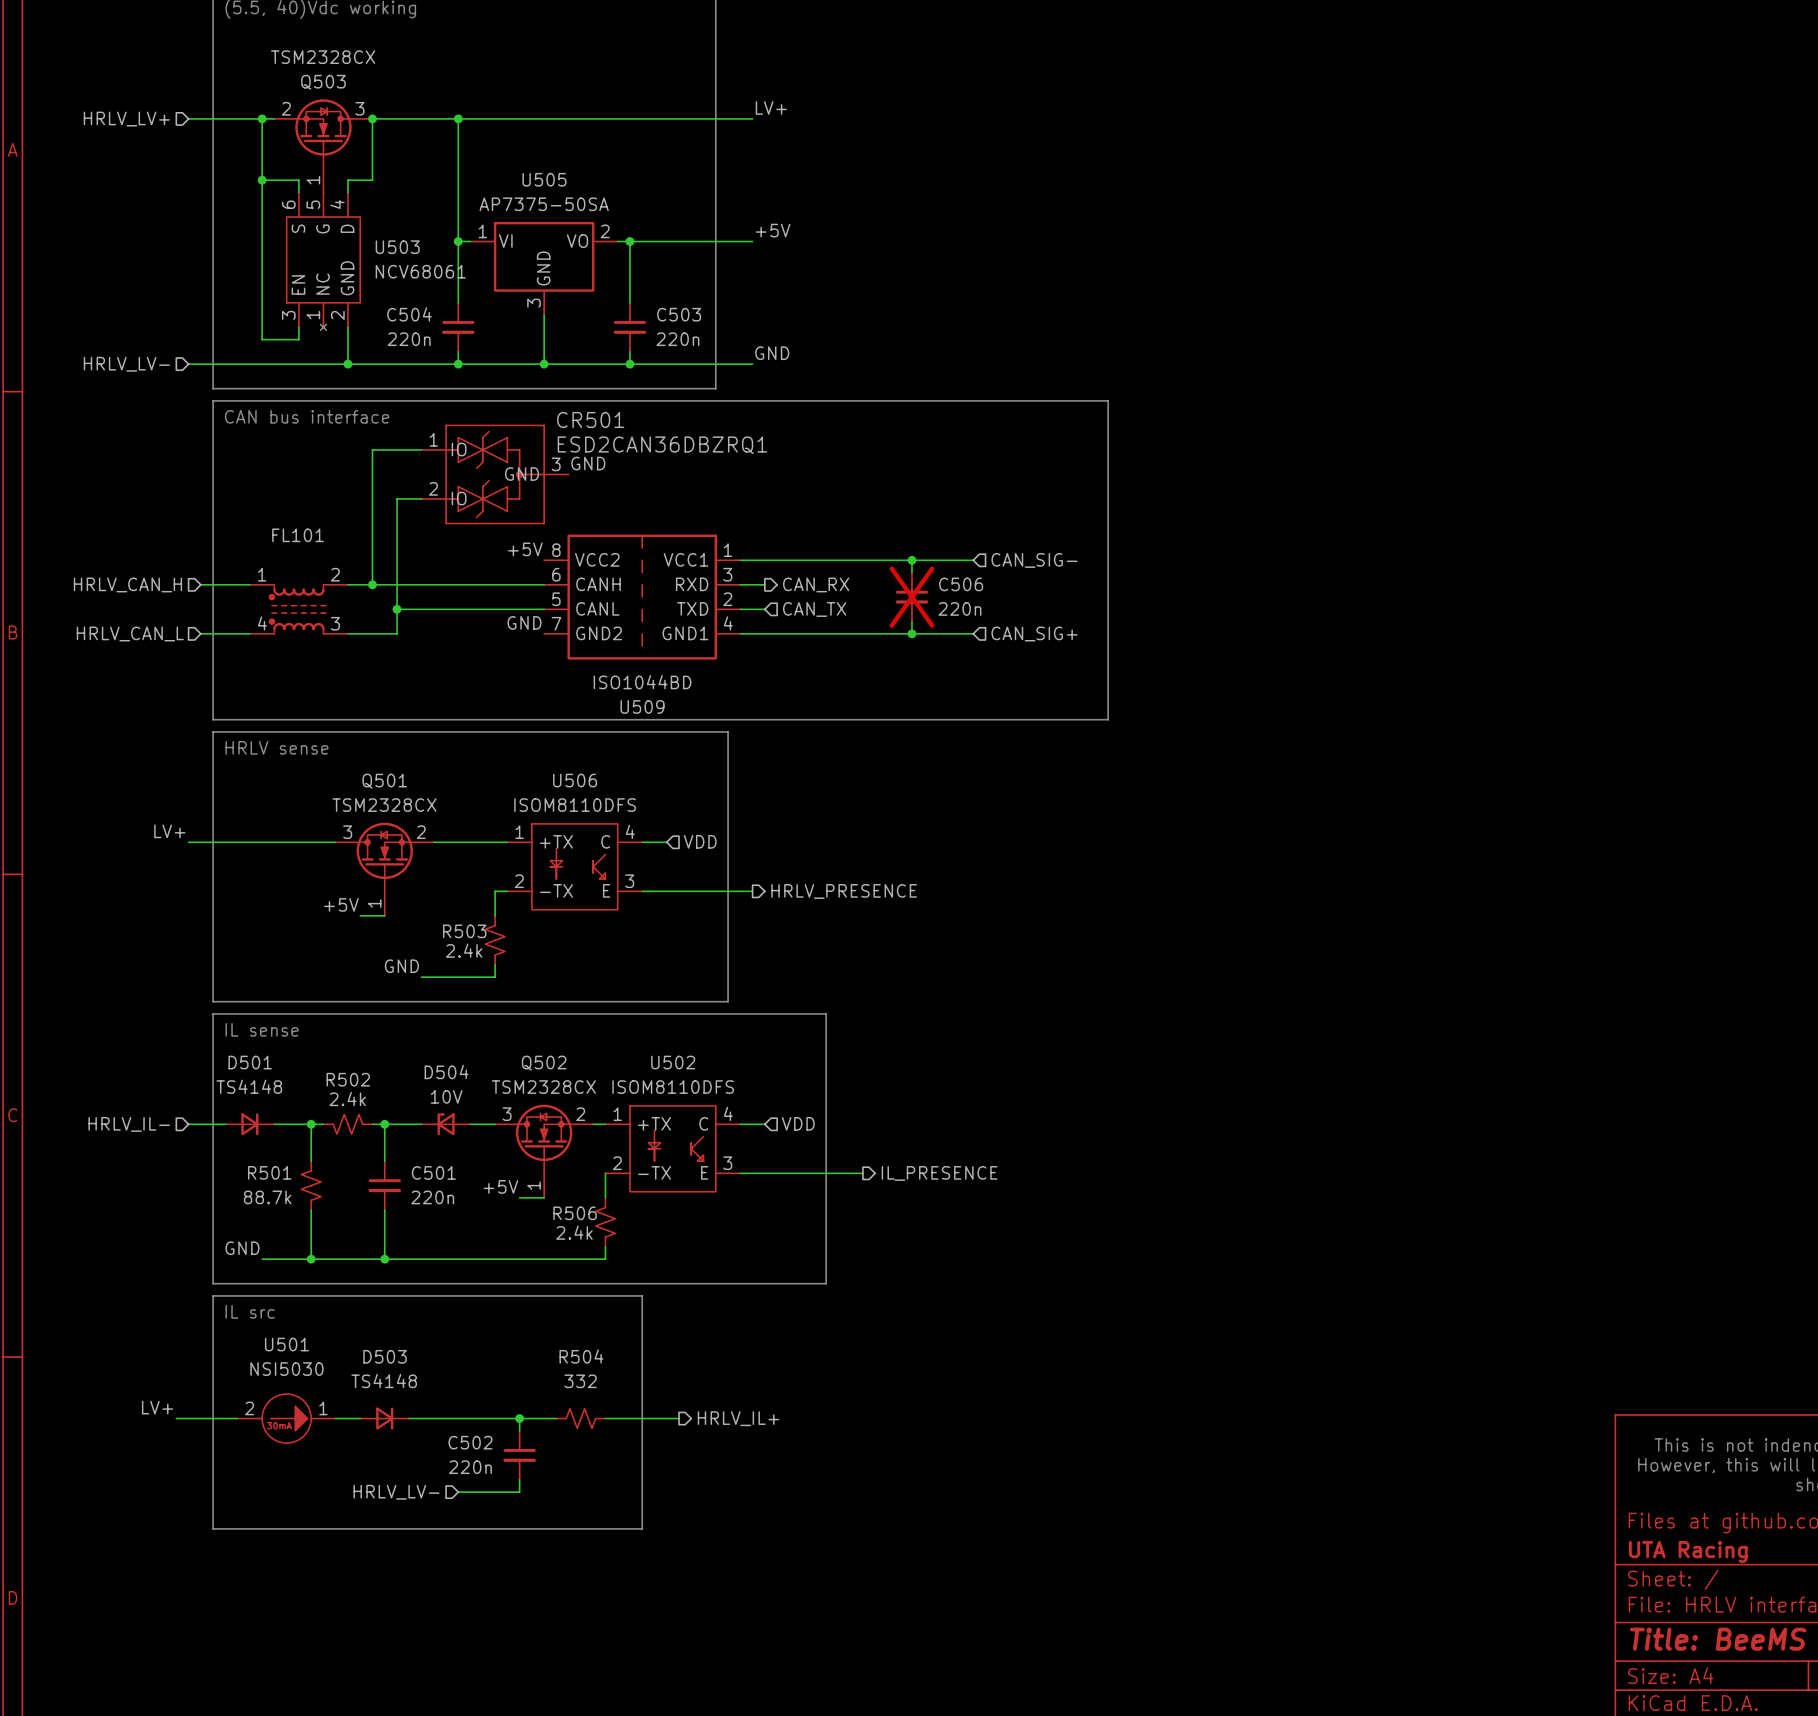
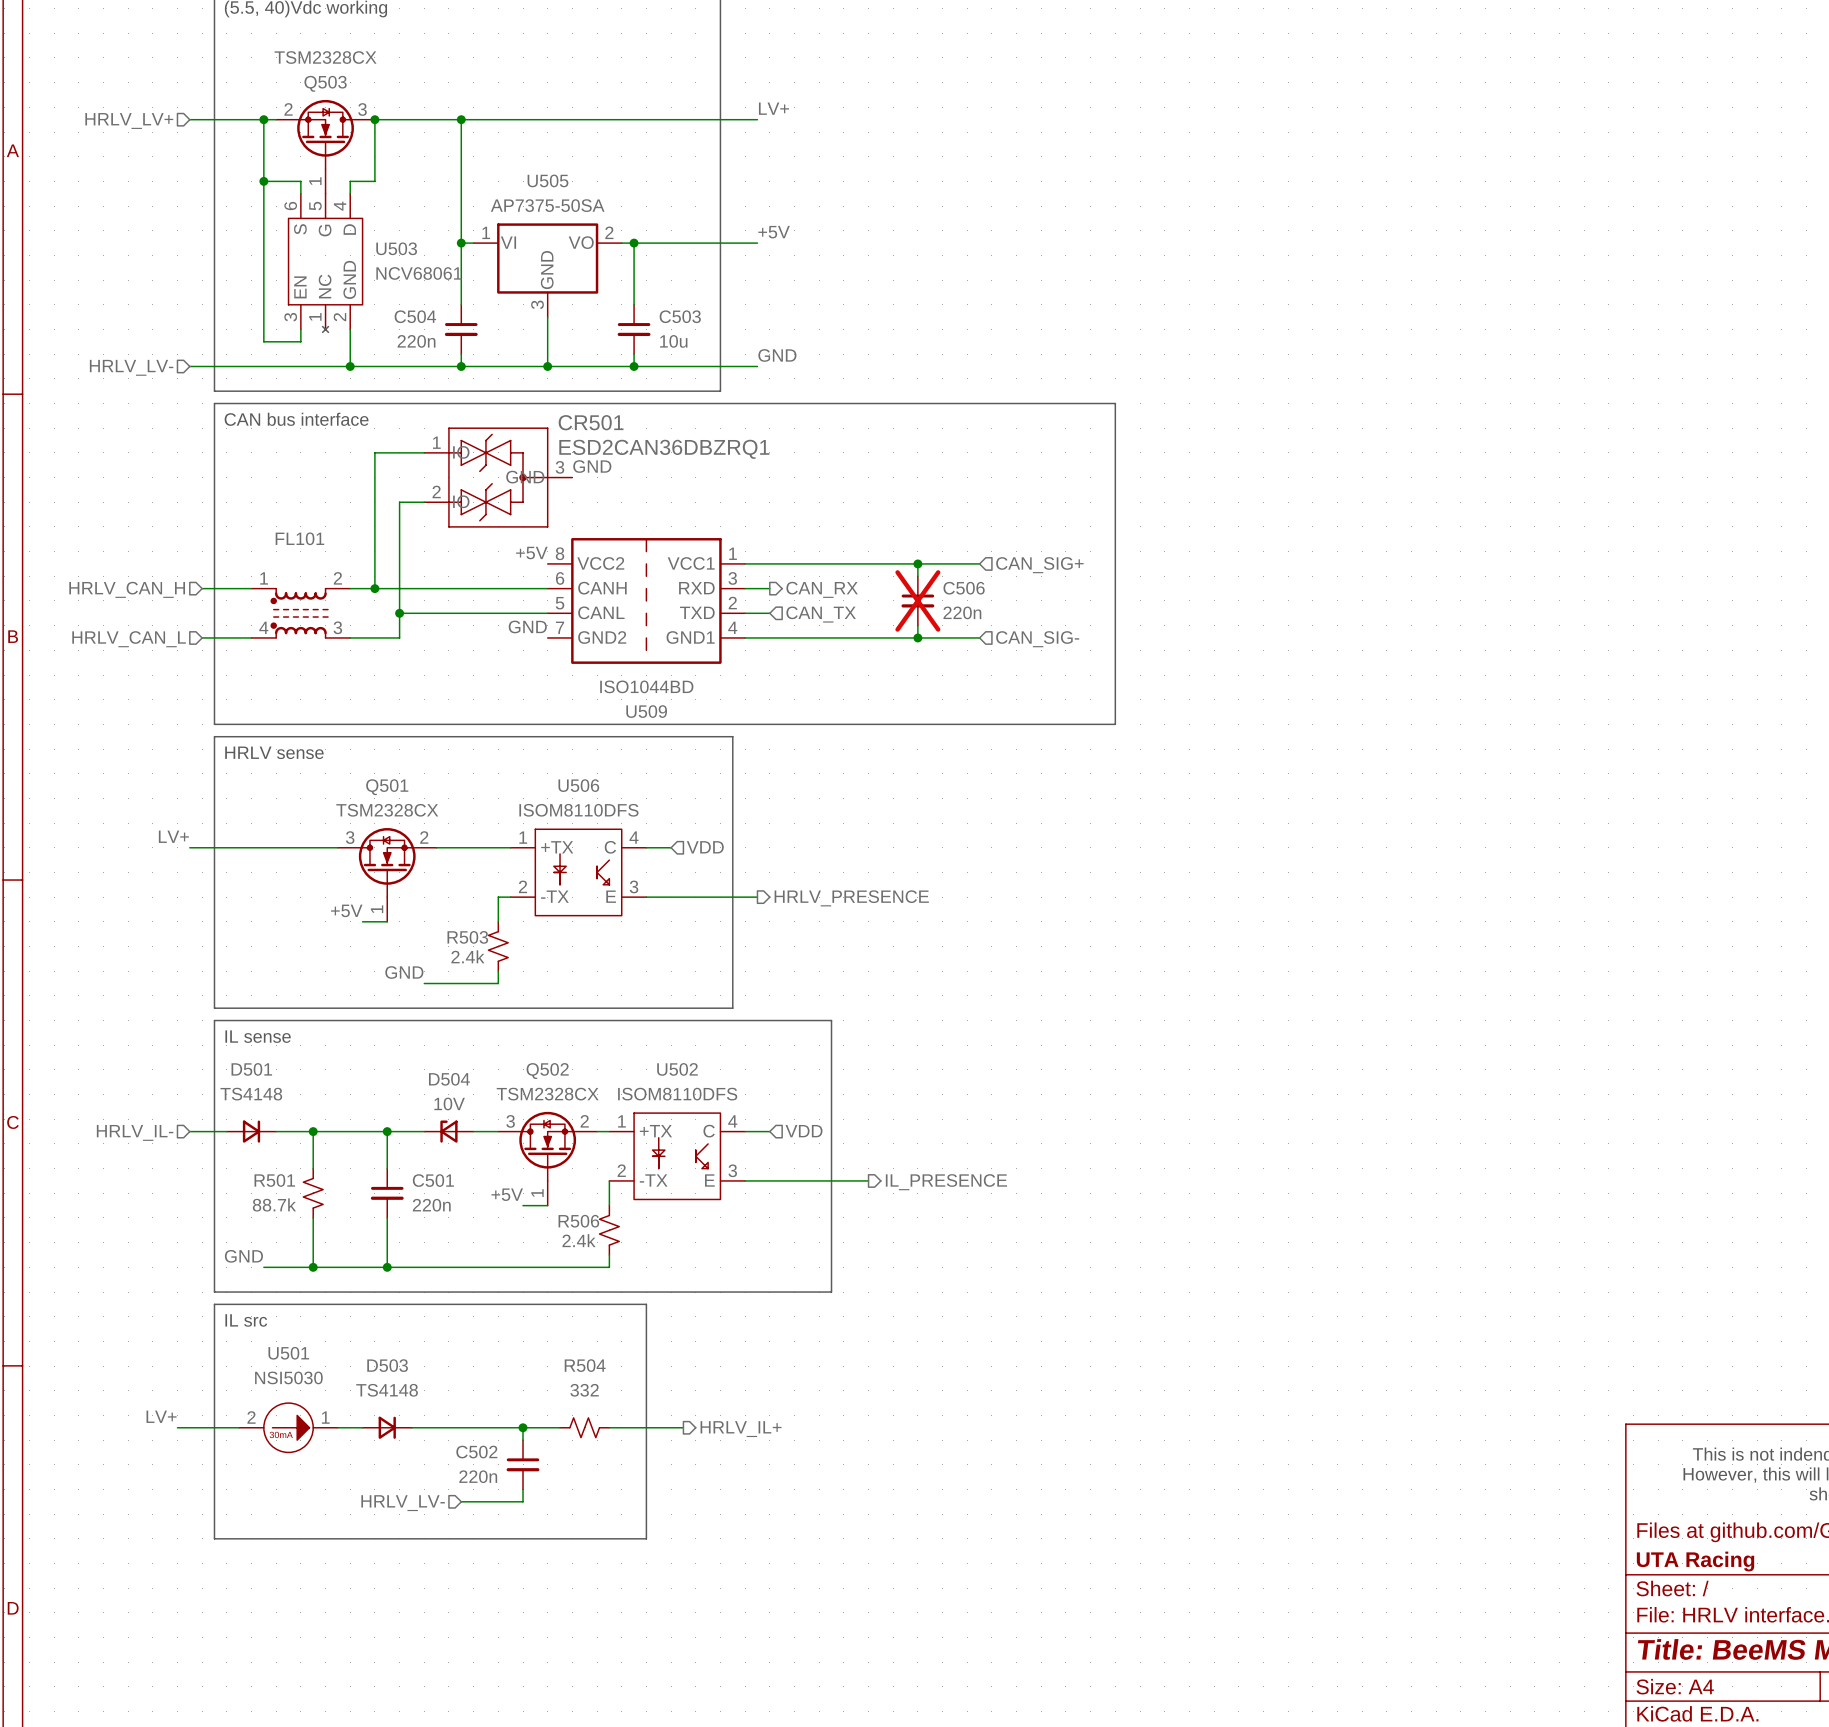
C503 value: 220n (677, 339) -> 10u (673, 341)
hierarchical label: CAN_SIG- (1034, 560) -> CAN_SIG+ (1039, 565)
hierarchical label: CAN_SIG+ (1034, 633) -> CAN_SIG- (1037, 639)
R502: 2.4k (347, 1124) -> none

